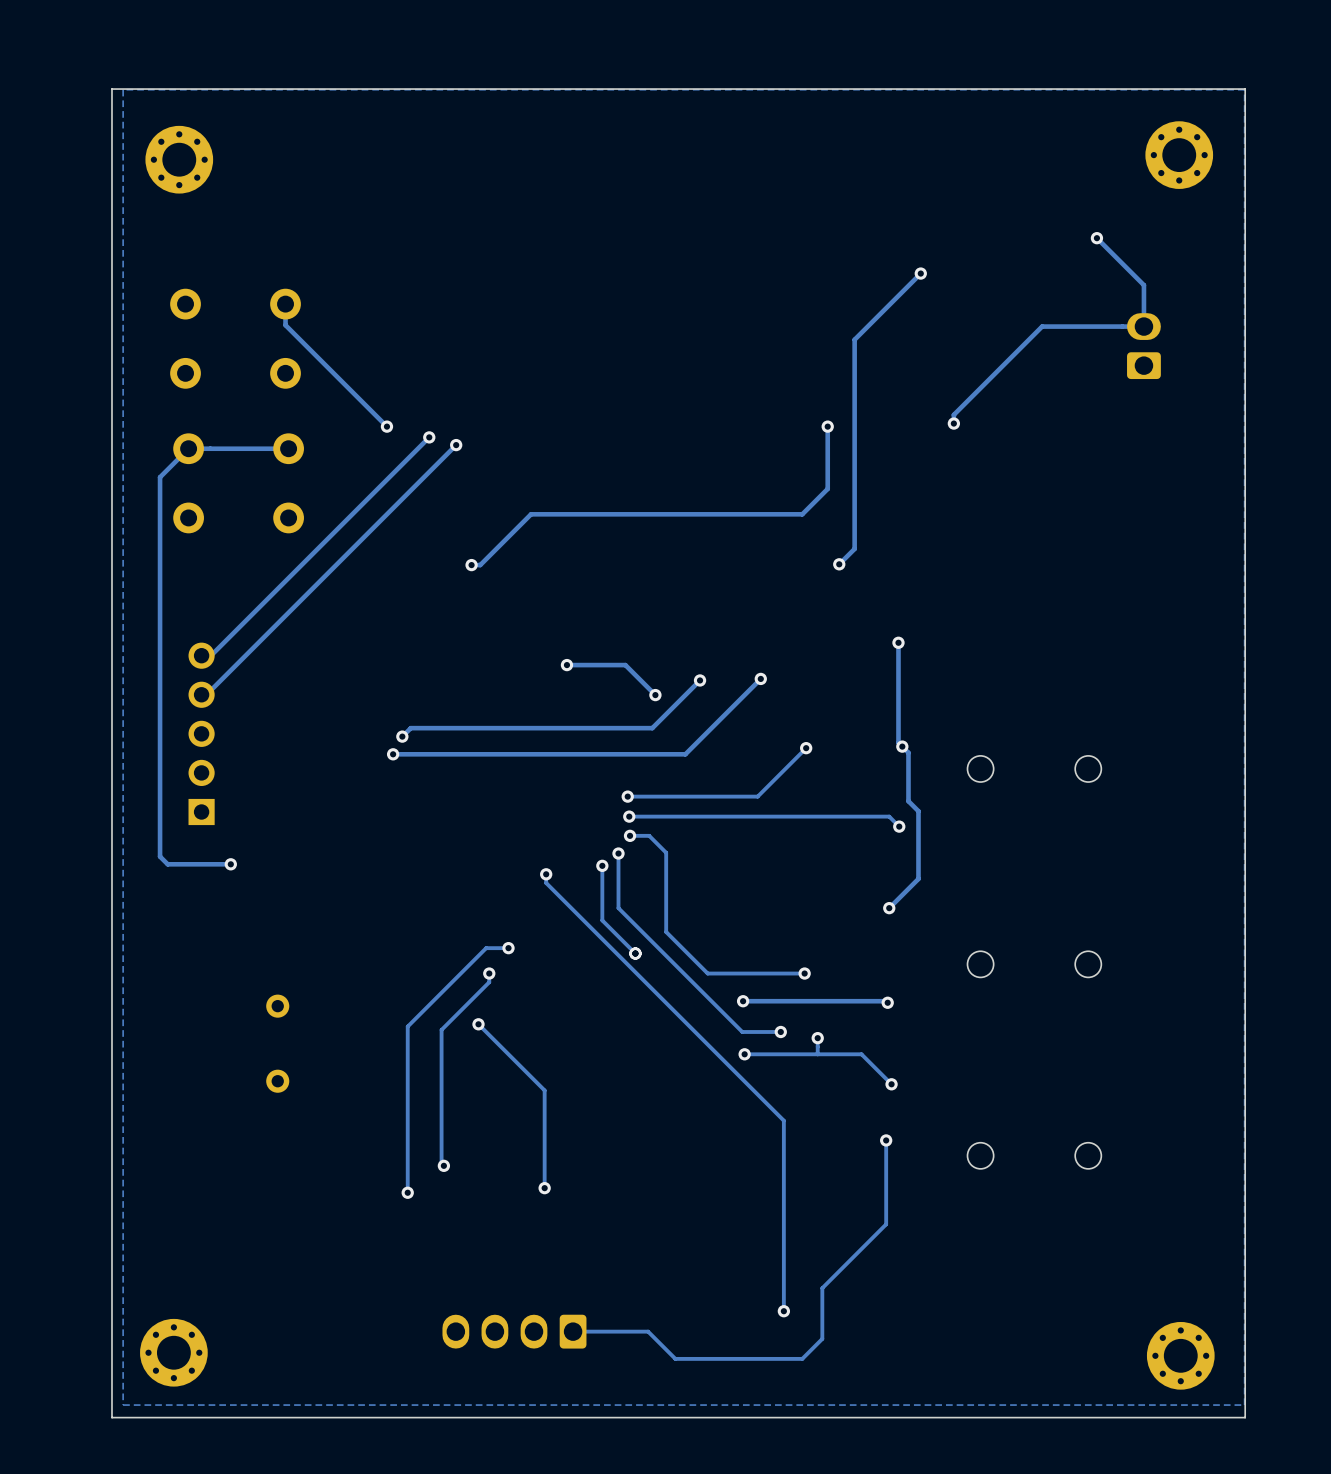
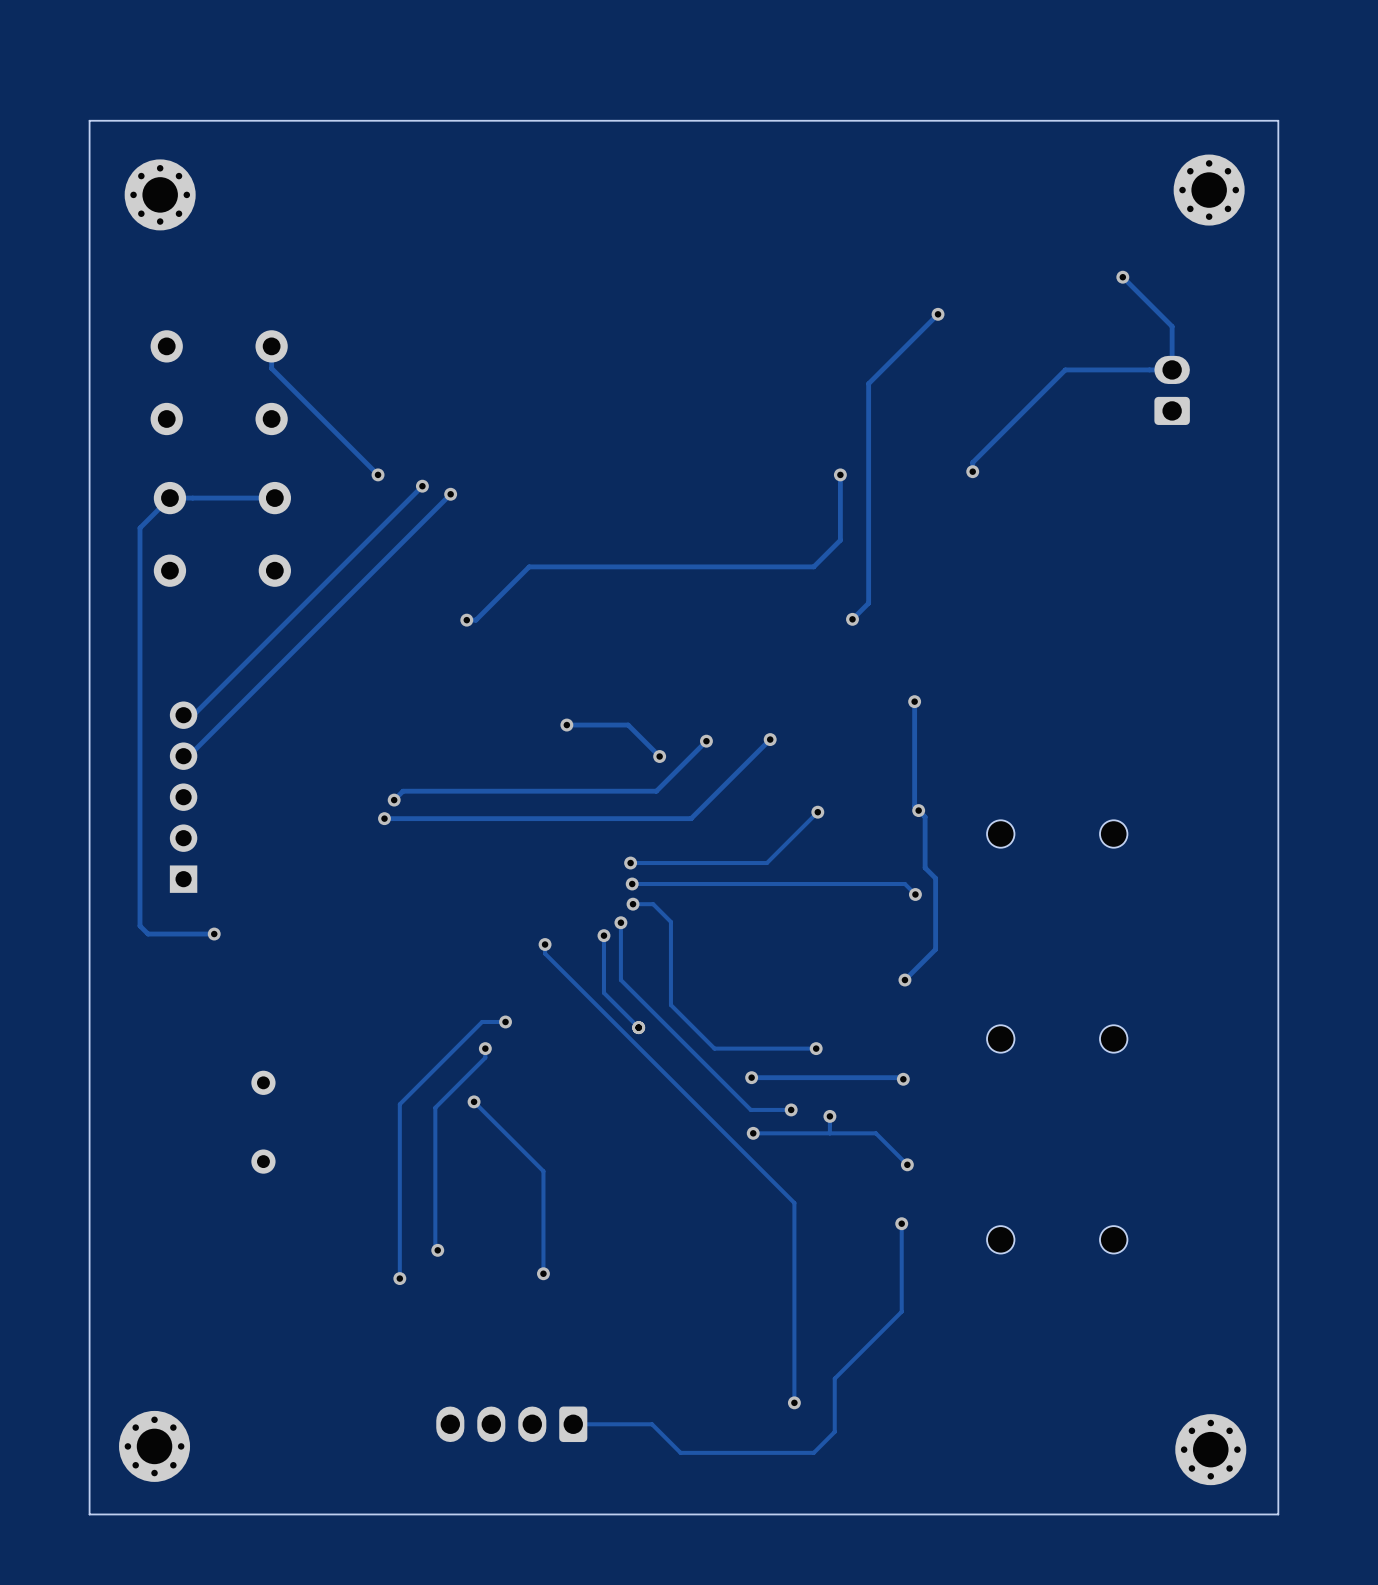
zone outline: (1244, 89) (1244, 1405) (123, 1405) (123, 89) (1244, 89) -> none

